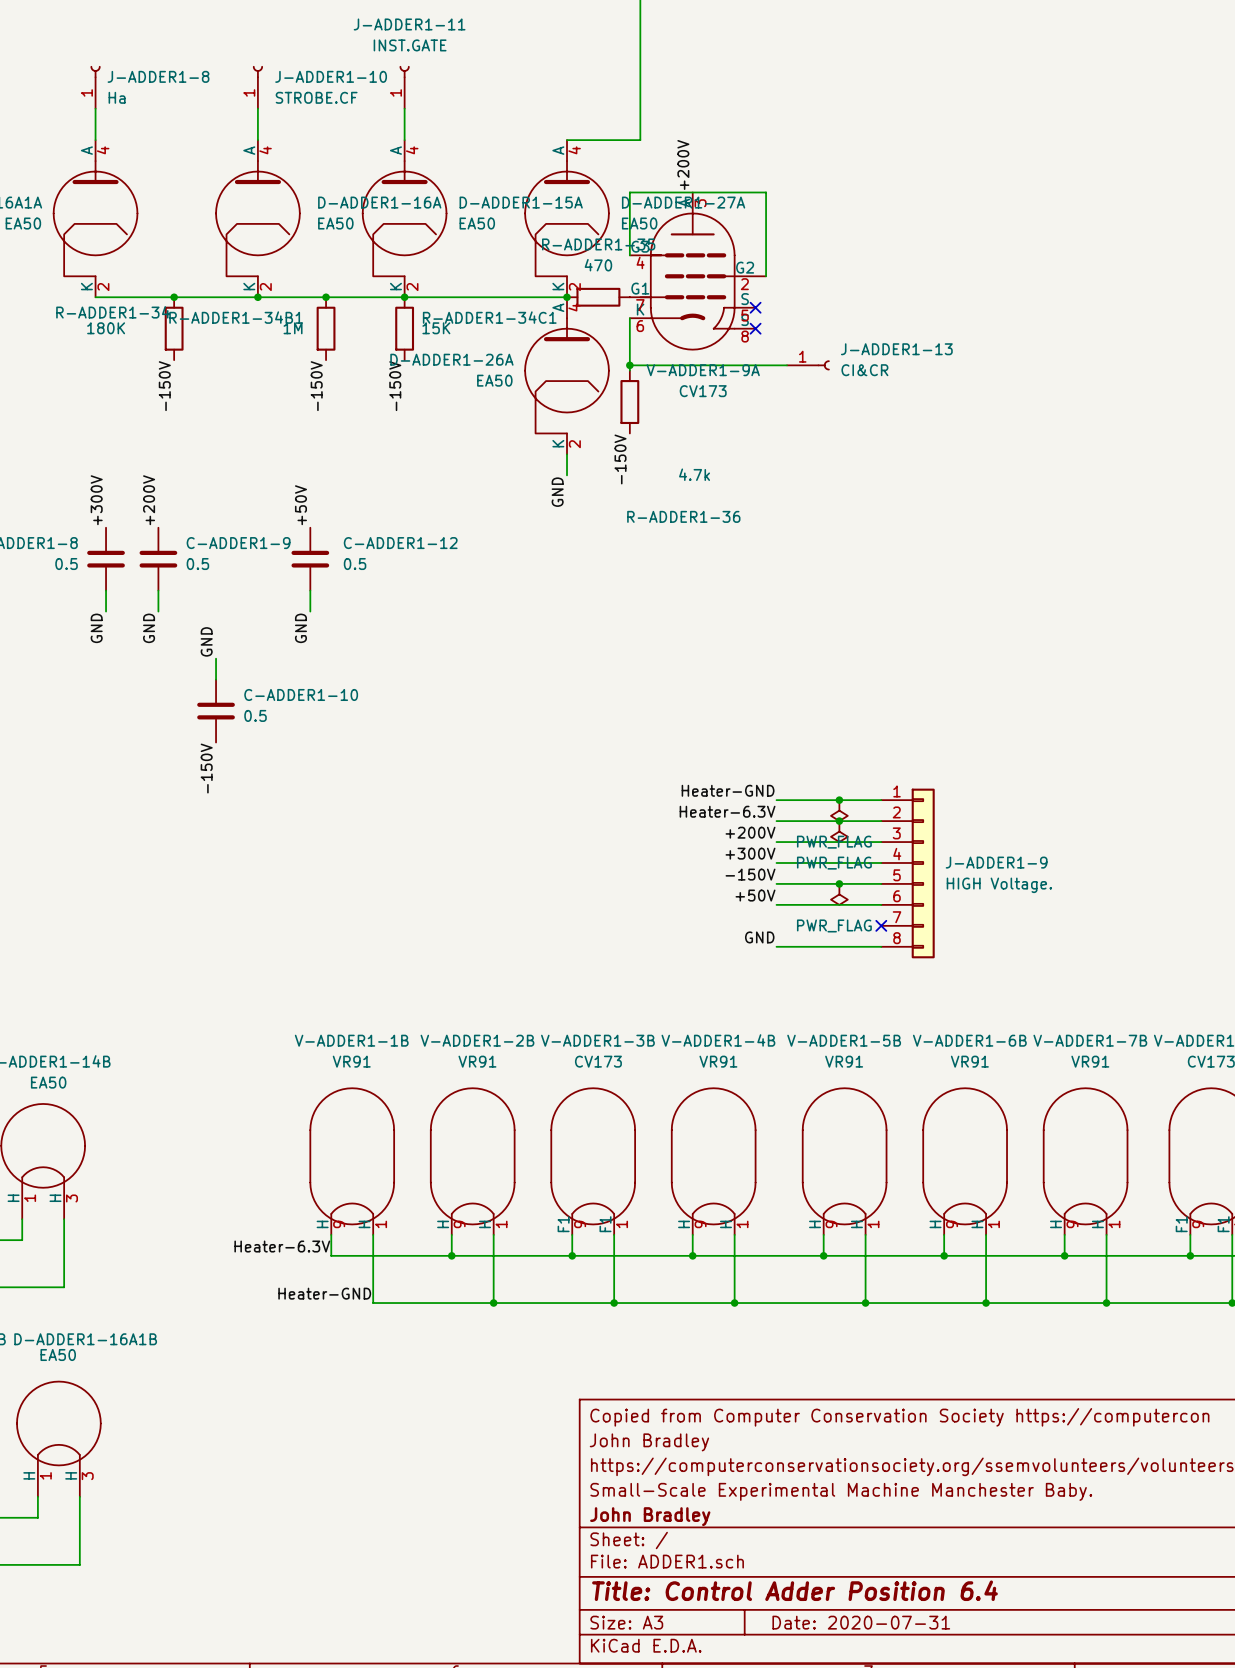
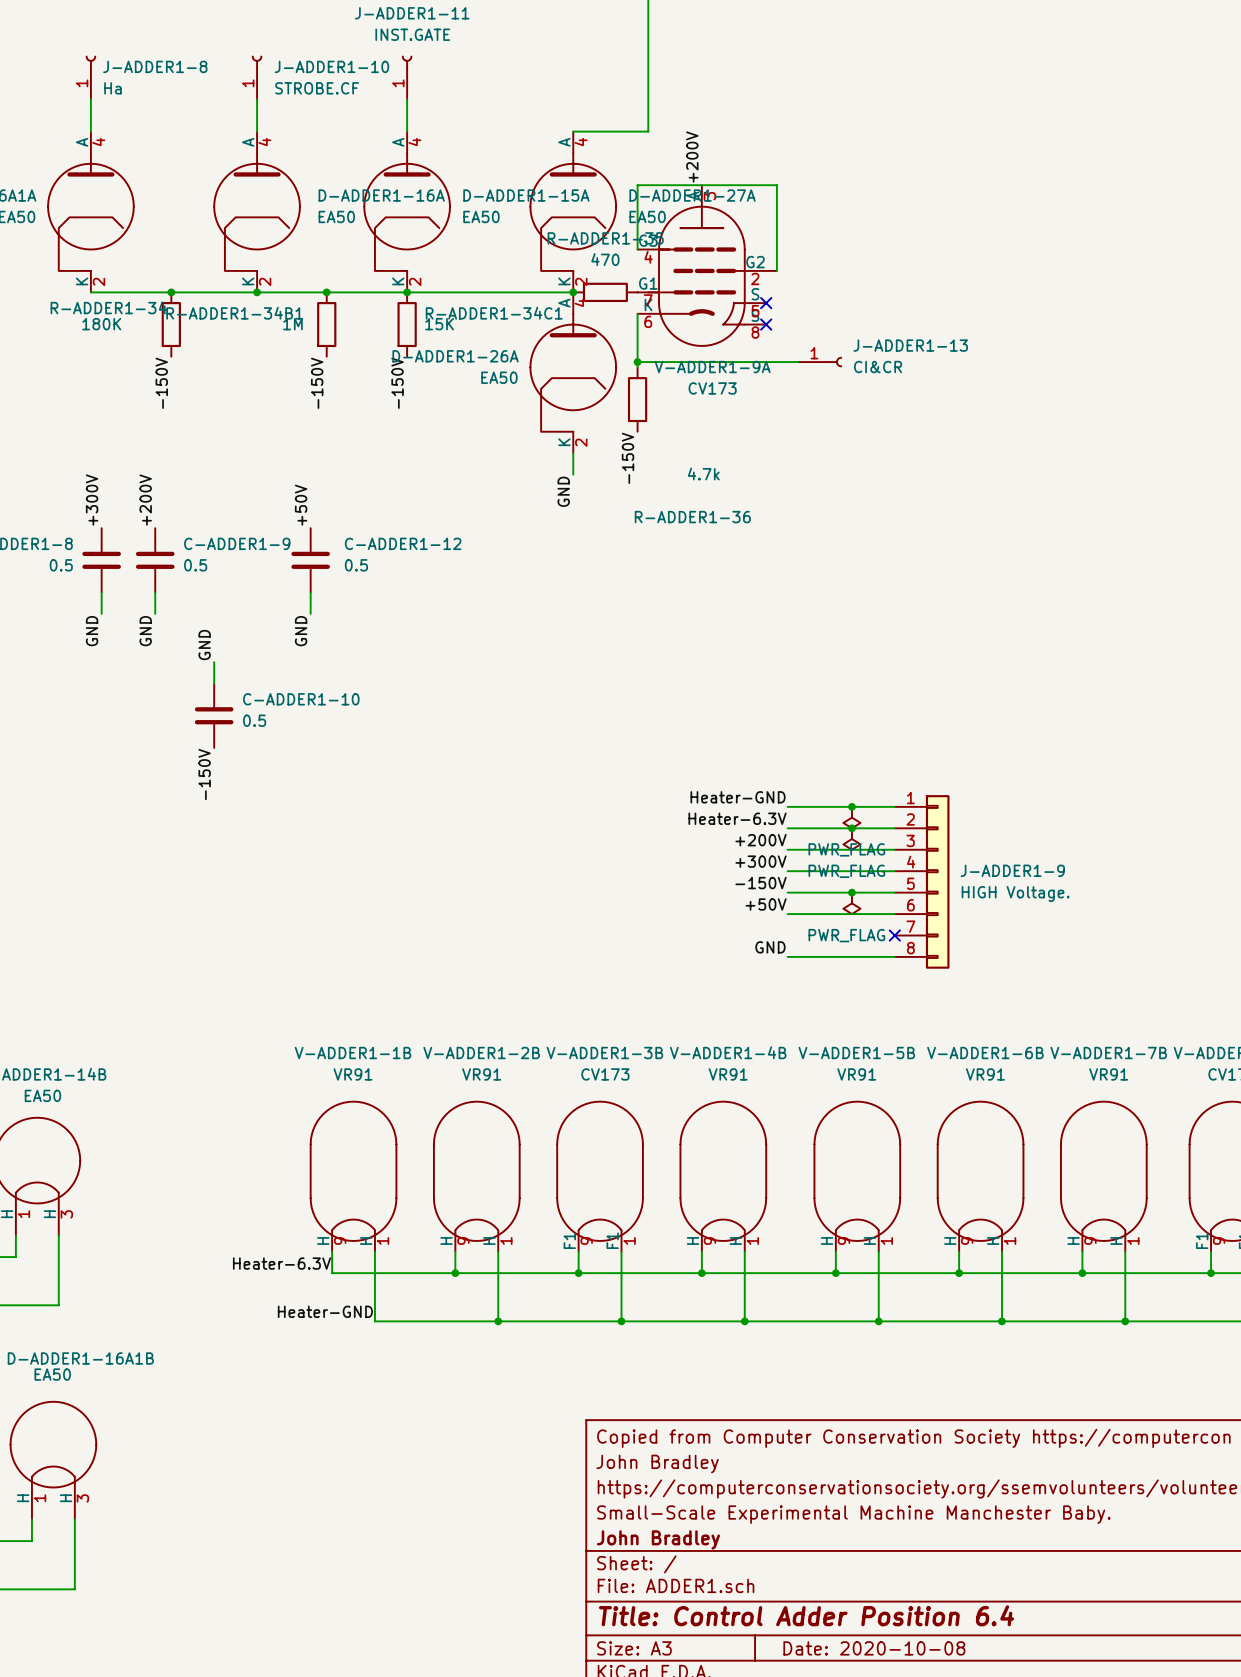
title block: Date: 2020-07-31 (861, 1622) -> Date: 2020-10-08 (874, 1648)

